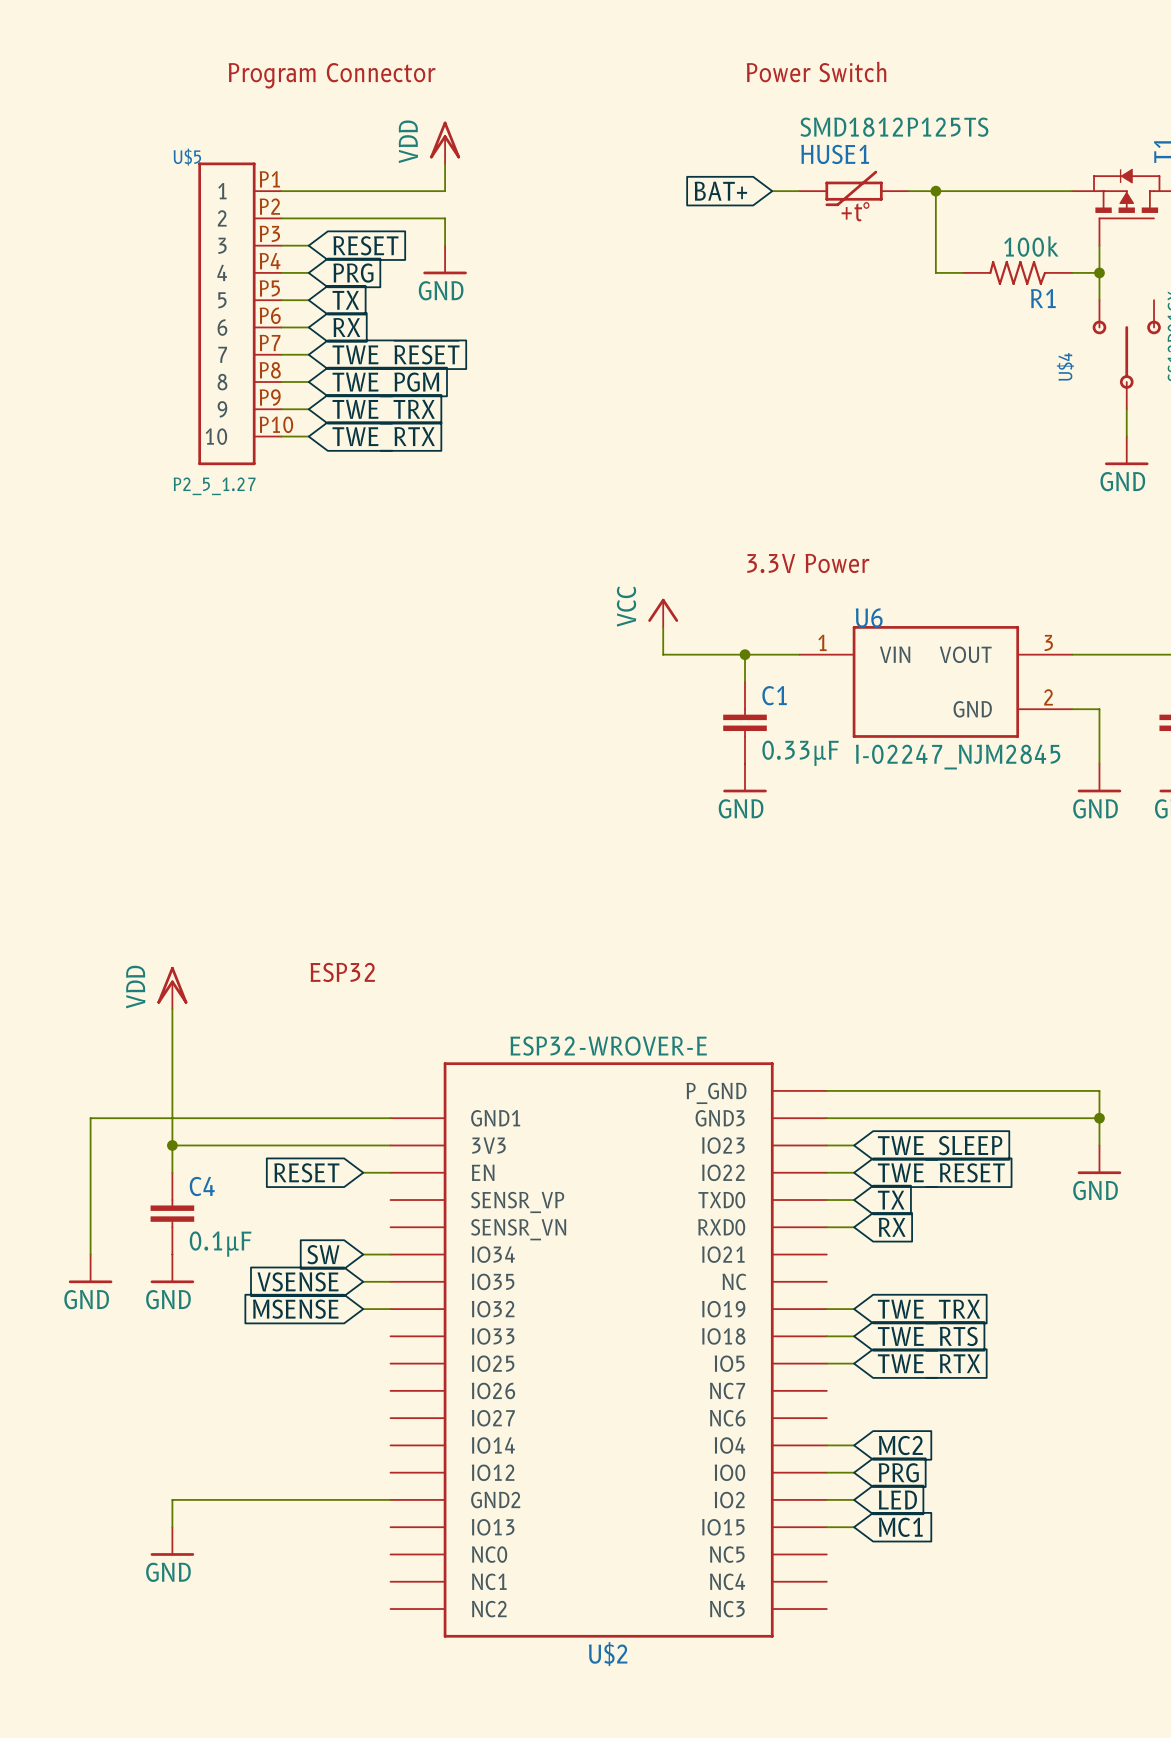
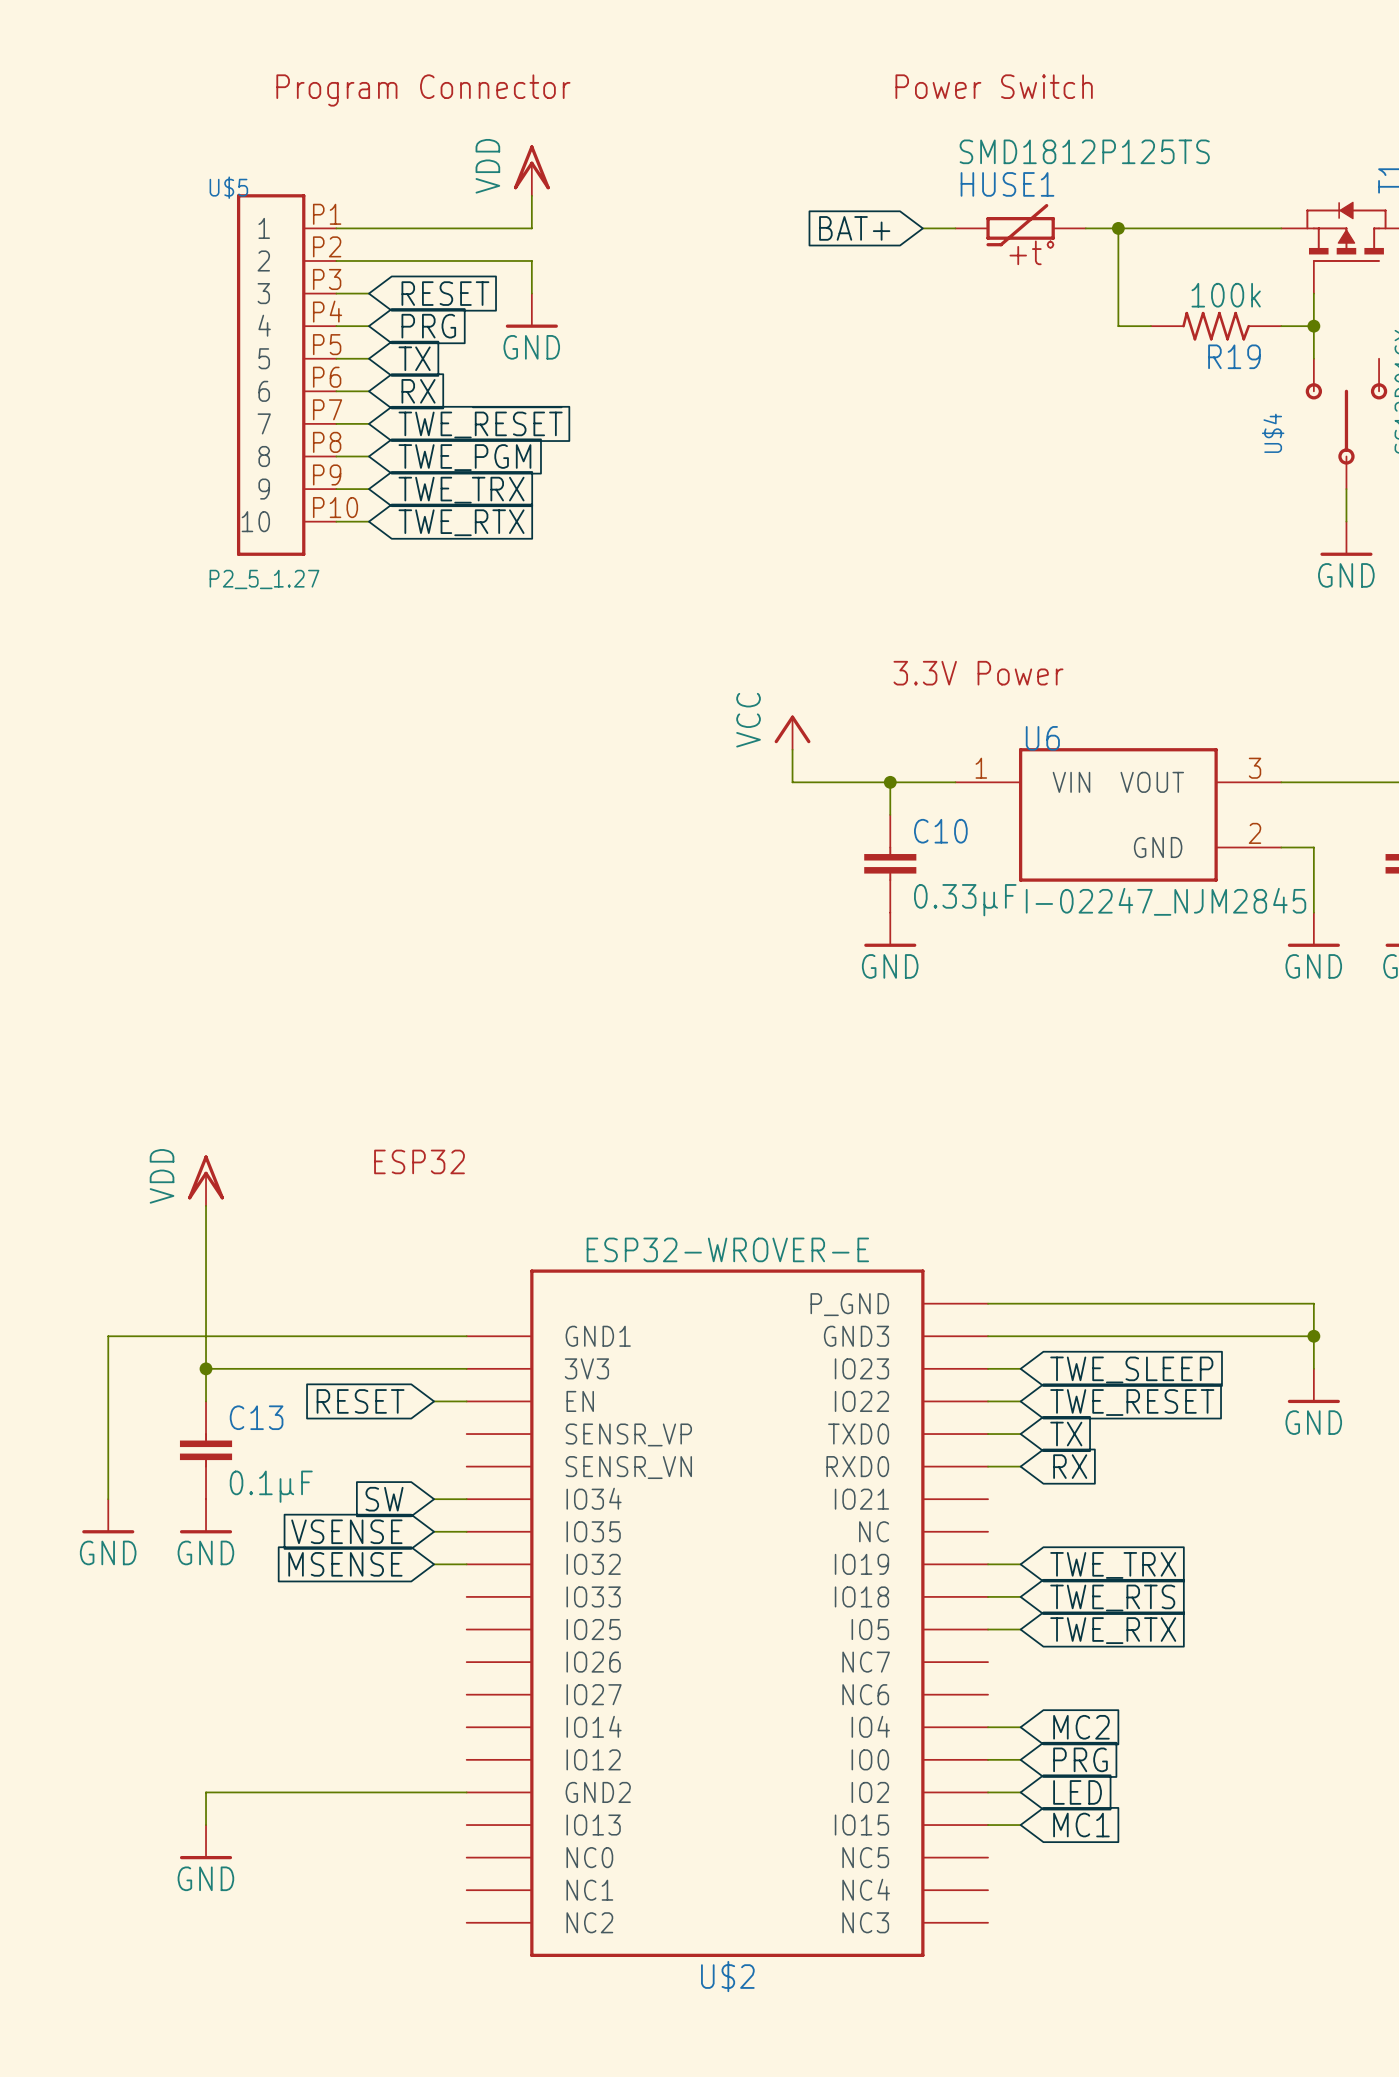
R1 name: R1 (1043, 298) -> R19 (1234, 356)
C1 name: C1 (774, 695) -> C10 (940, 831)
C4 name: C4 (202, 1186) -> C13 (256, 1417)

